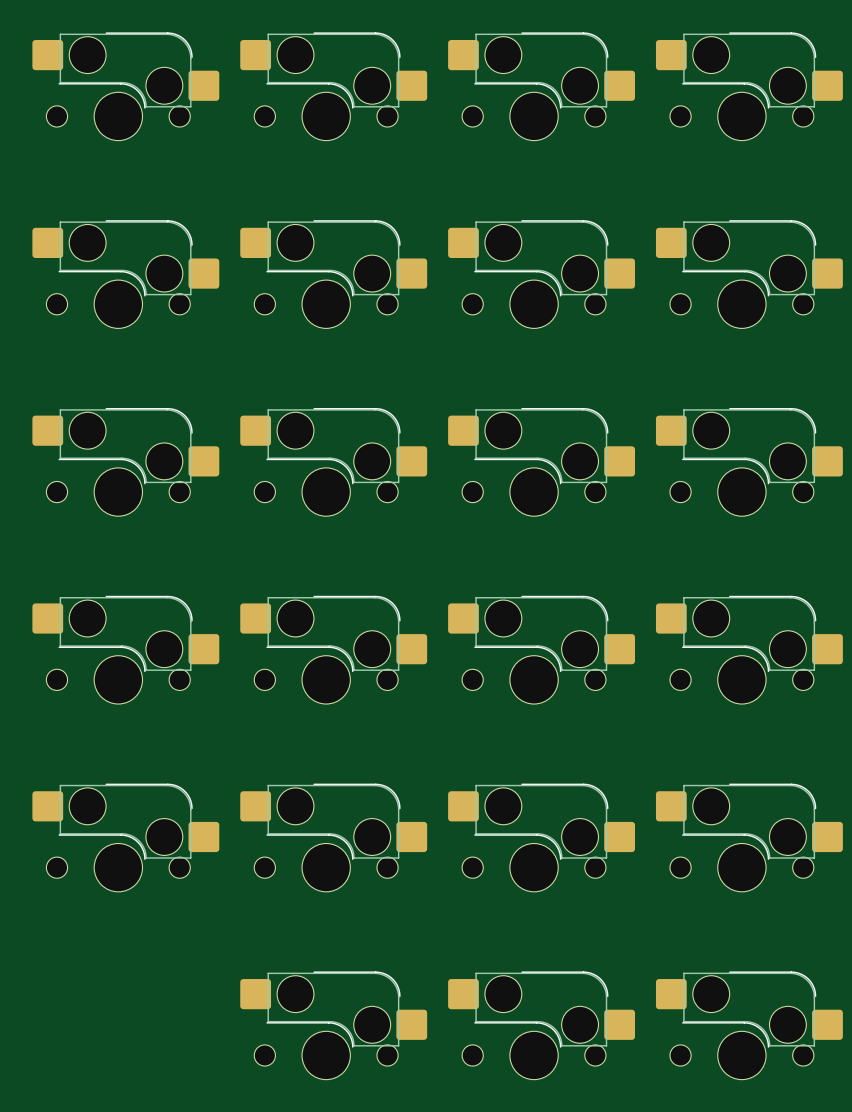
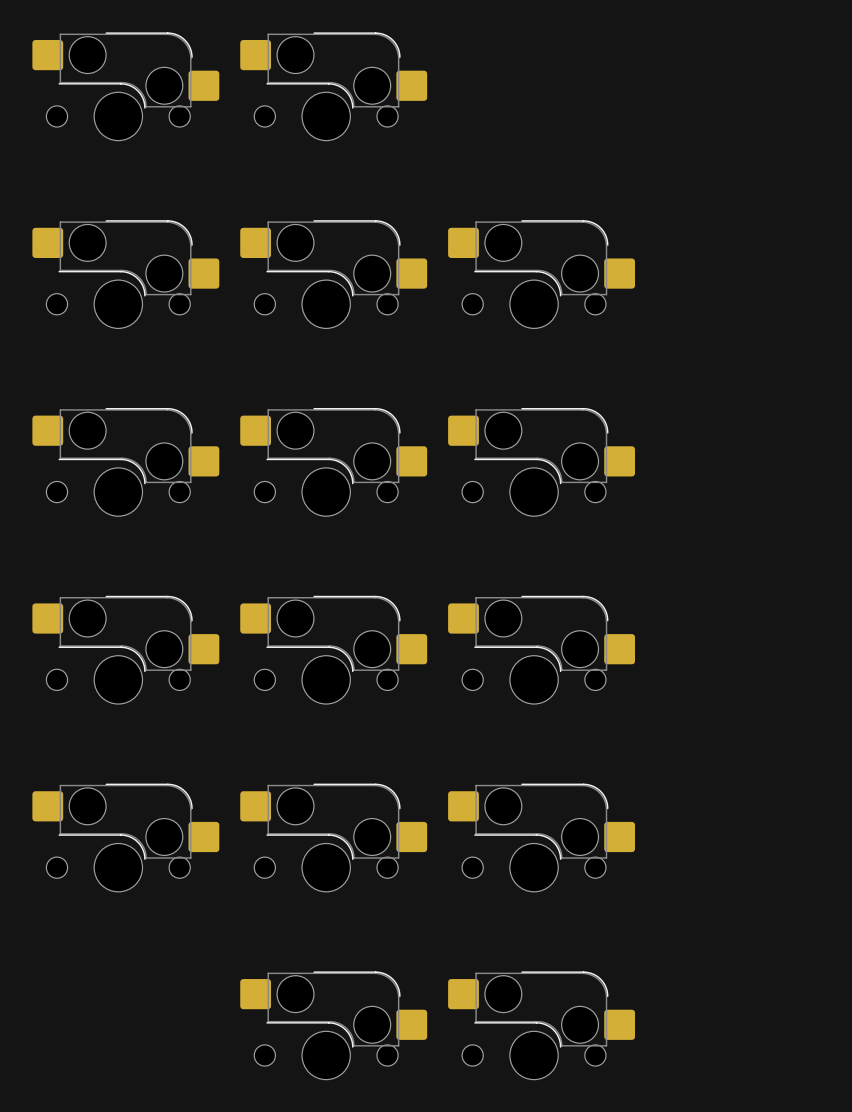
part: (541, 86) -> none
part: (749, 86) -> none
part: (749, 274) -> none
part: (749, 462) -> none
part: (749, 649) -> none
part: (749, 837) -> none
part: (749, 1025) -> none

